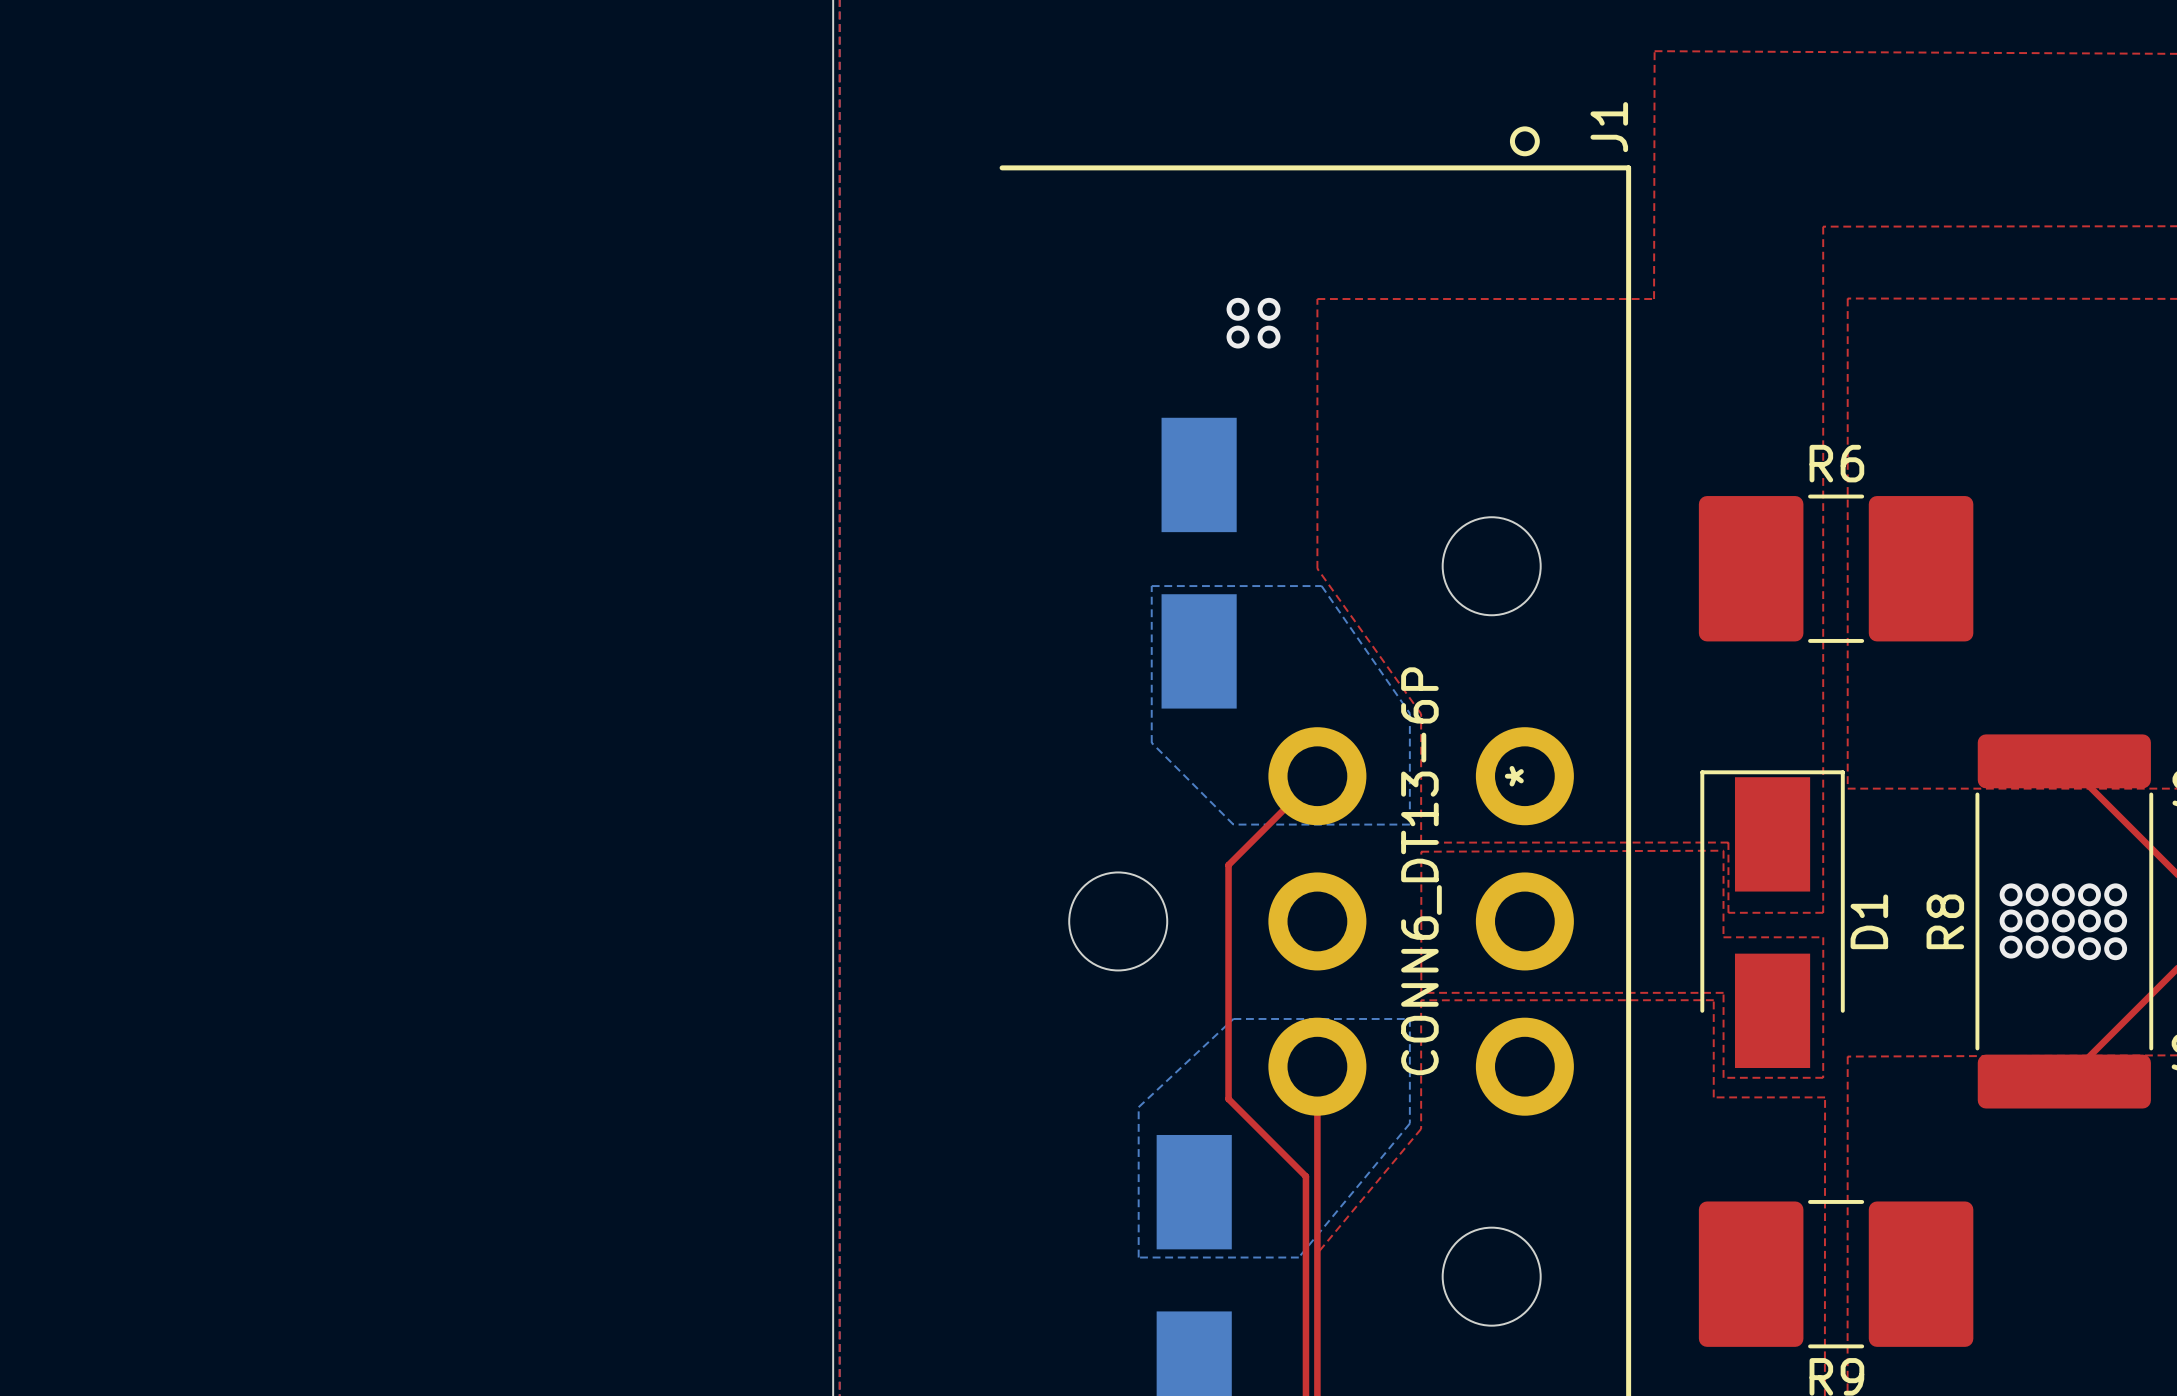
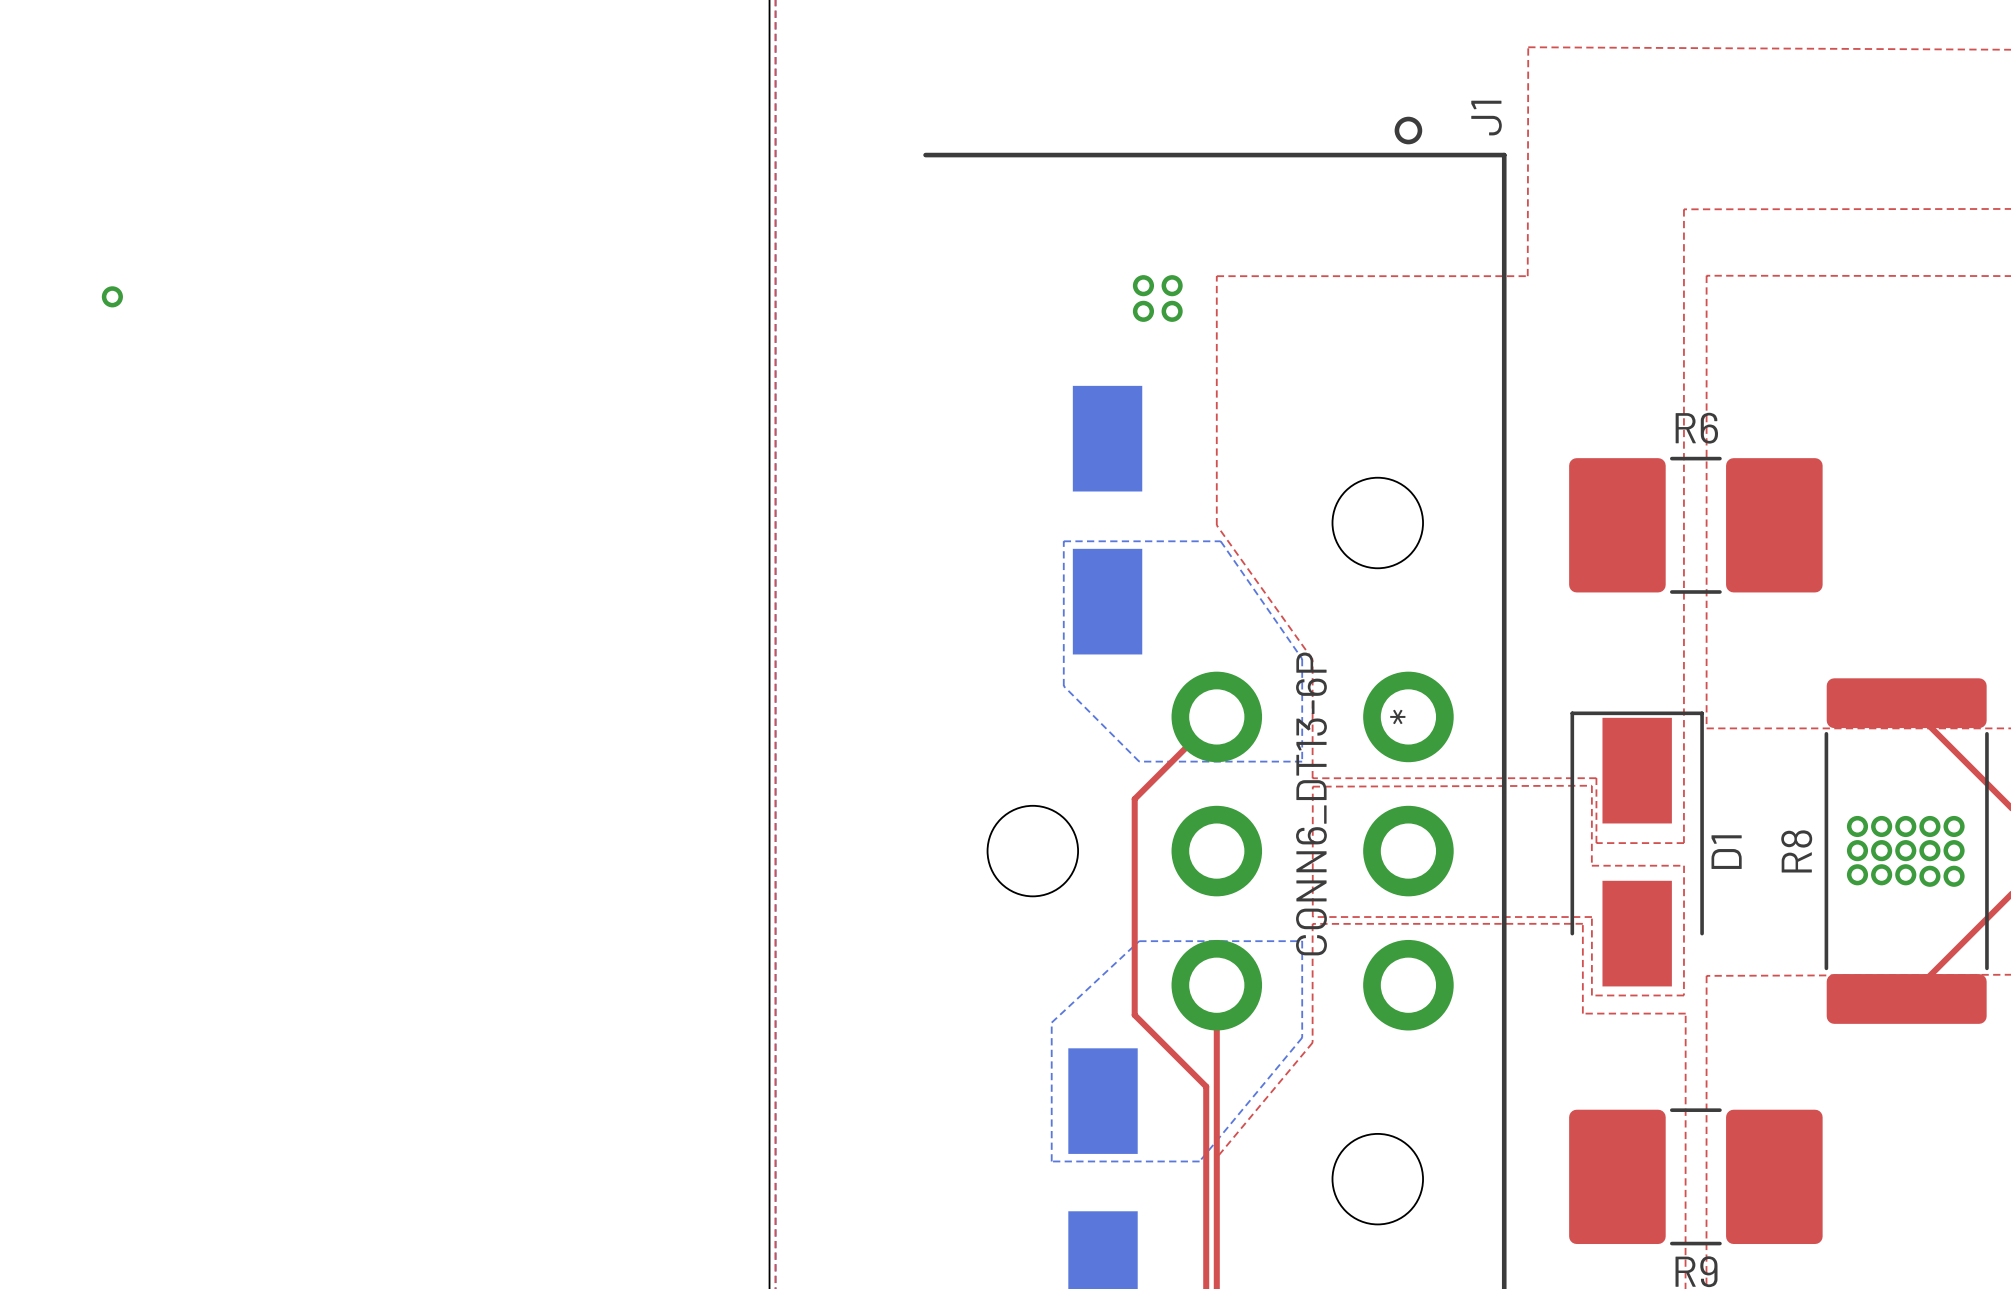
via: none -> (112, 296)

